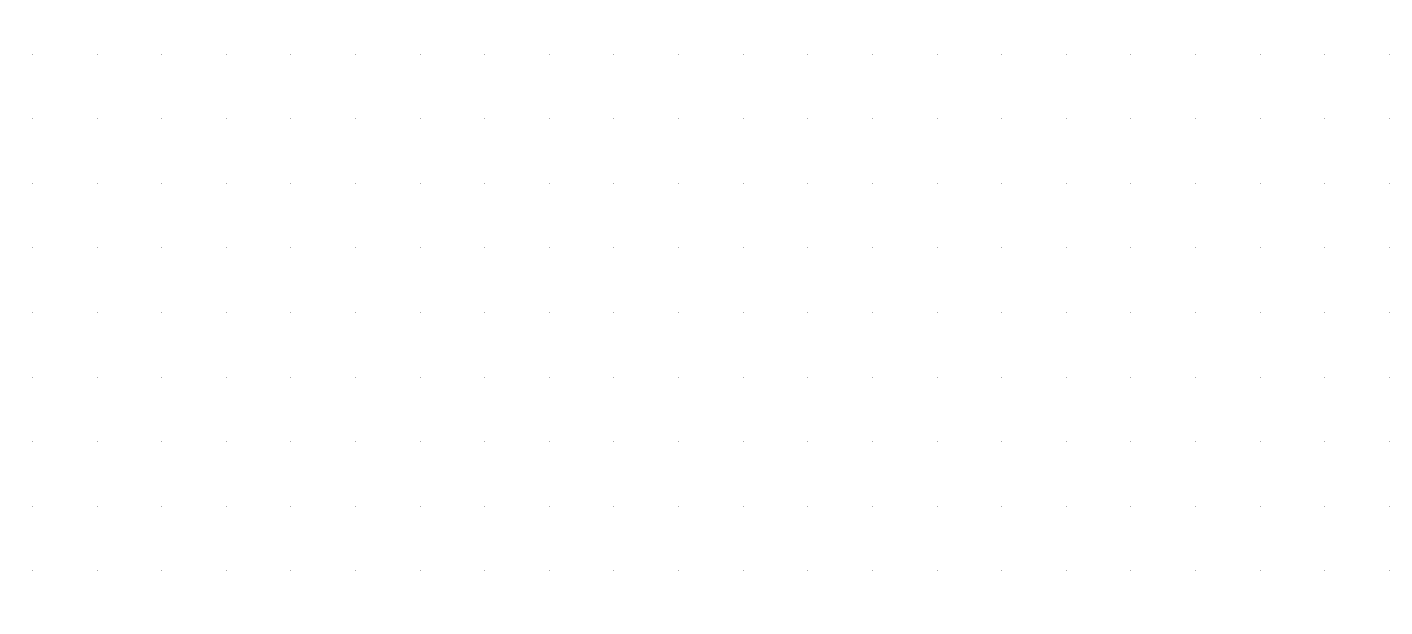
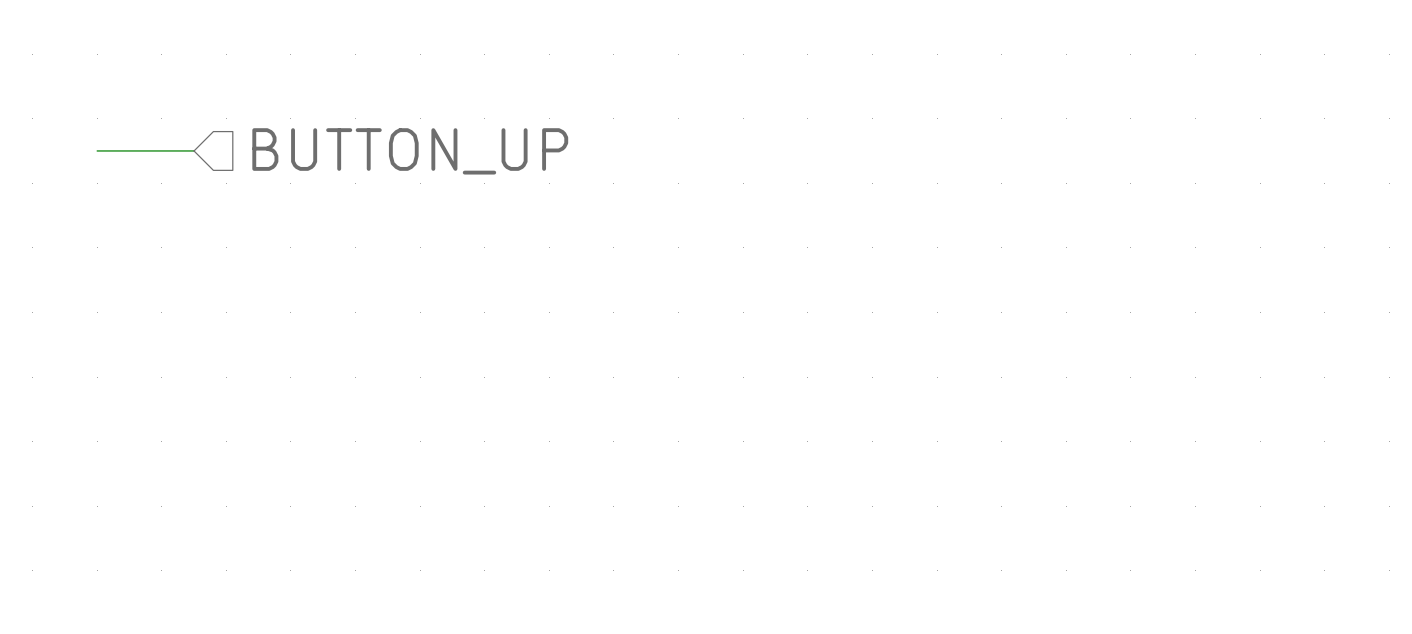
wire: none -> (97, 150) (194, 150)
hierarchical label: none -> BUTTON_UP (410, 151)

